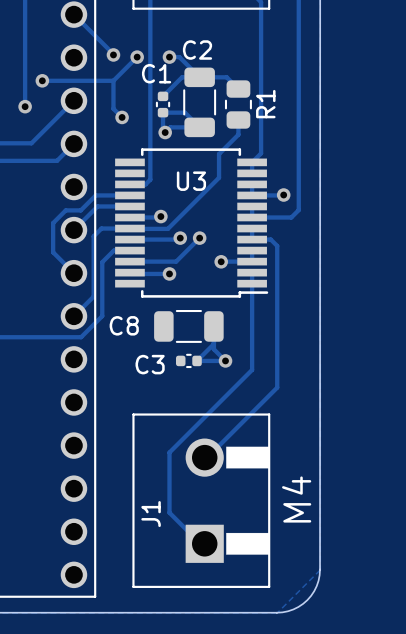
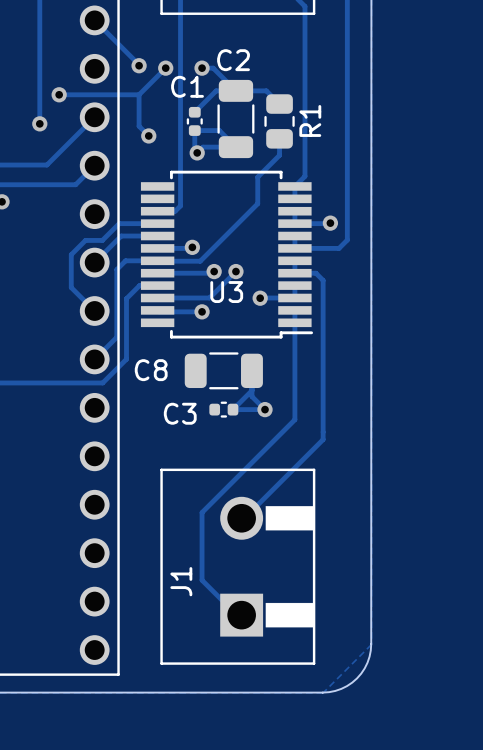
U3 name position: U3 (191, 181) -> U3 (226, 292)
text: M4 (296, 499) -> none

